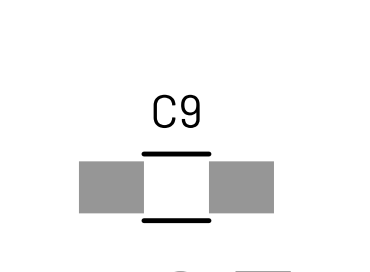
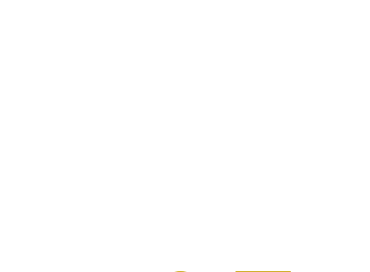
C9: (176, 187) -> none

